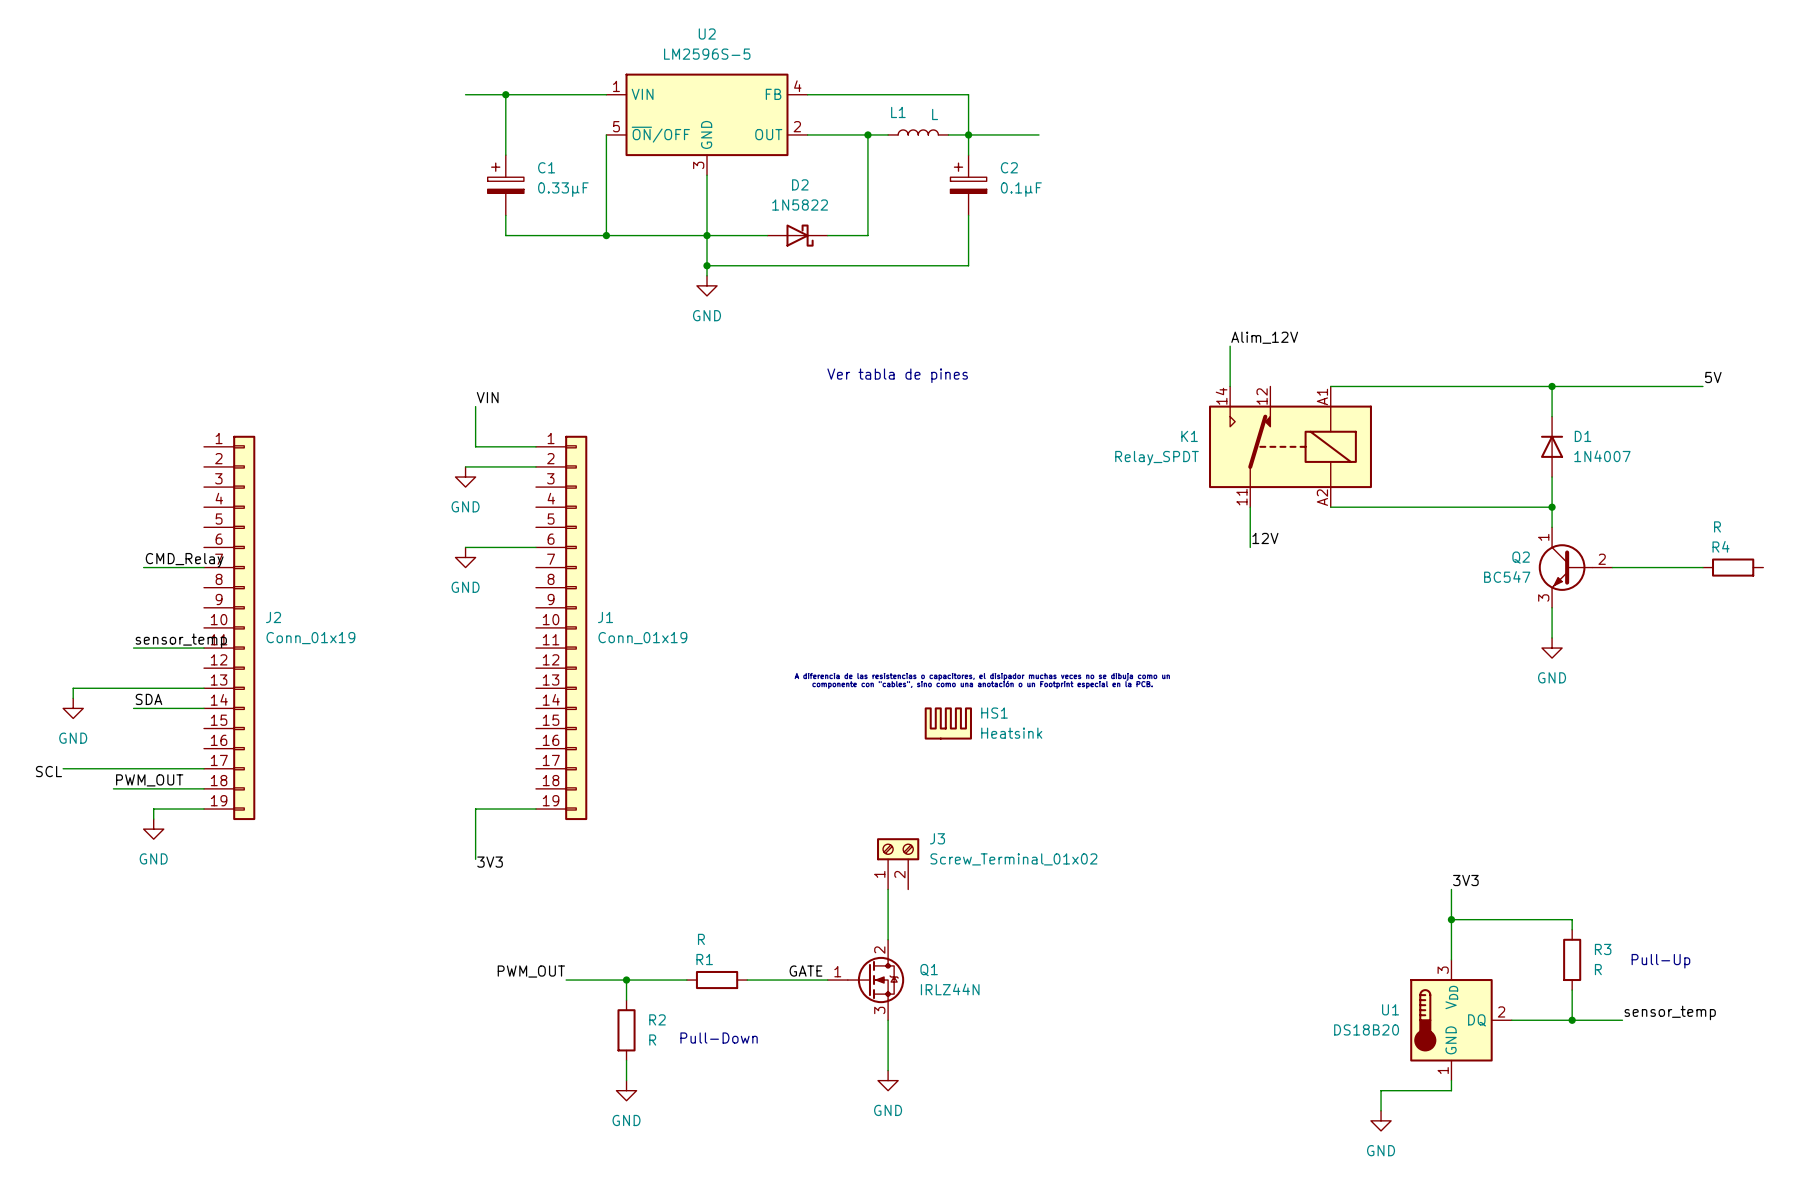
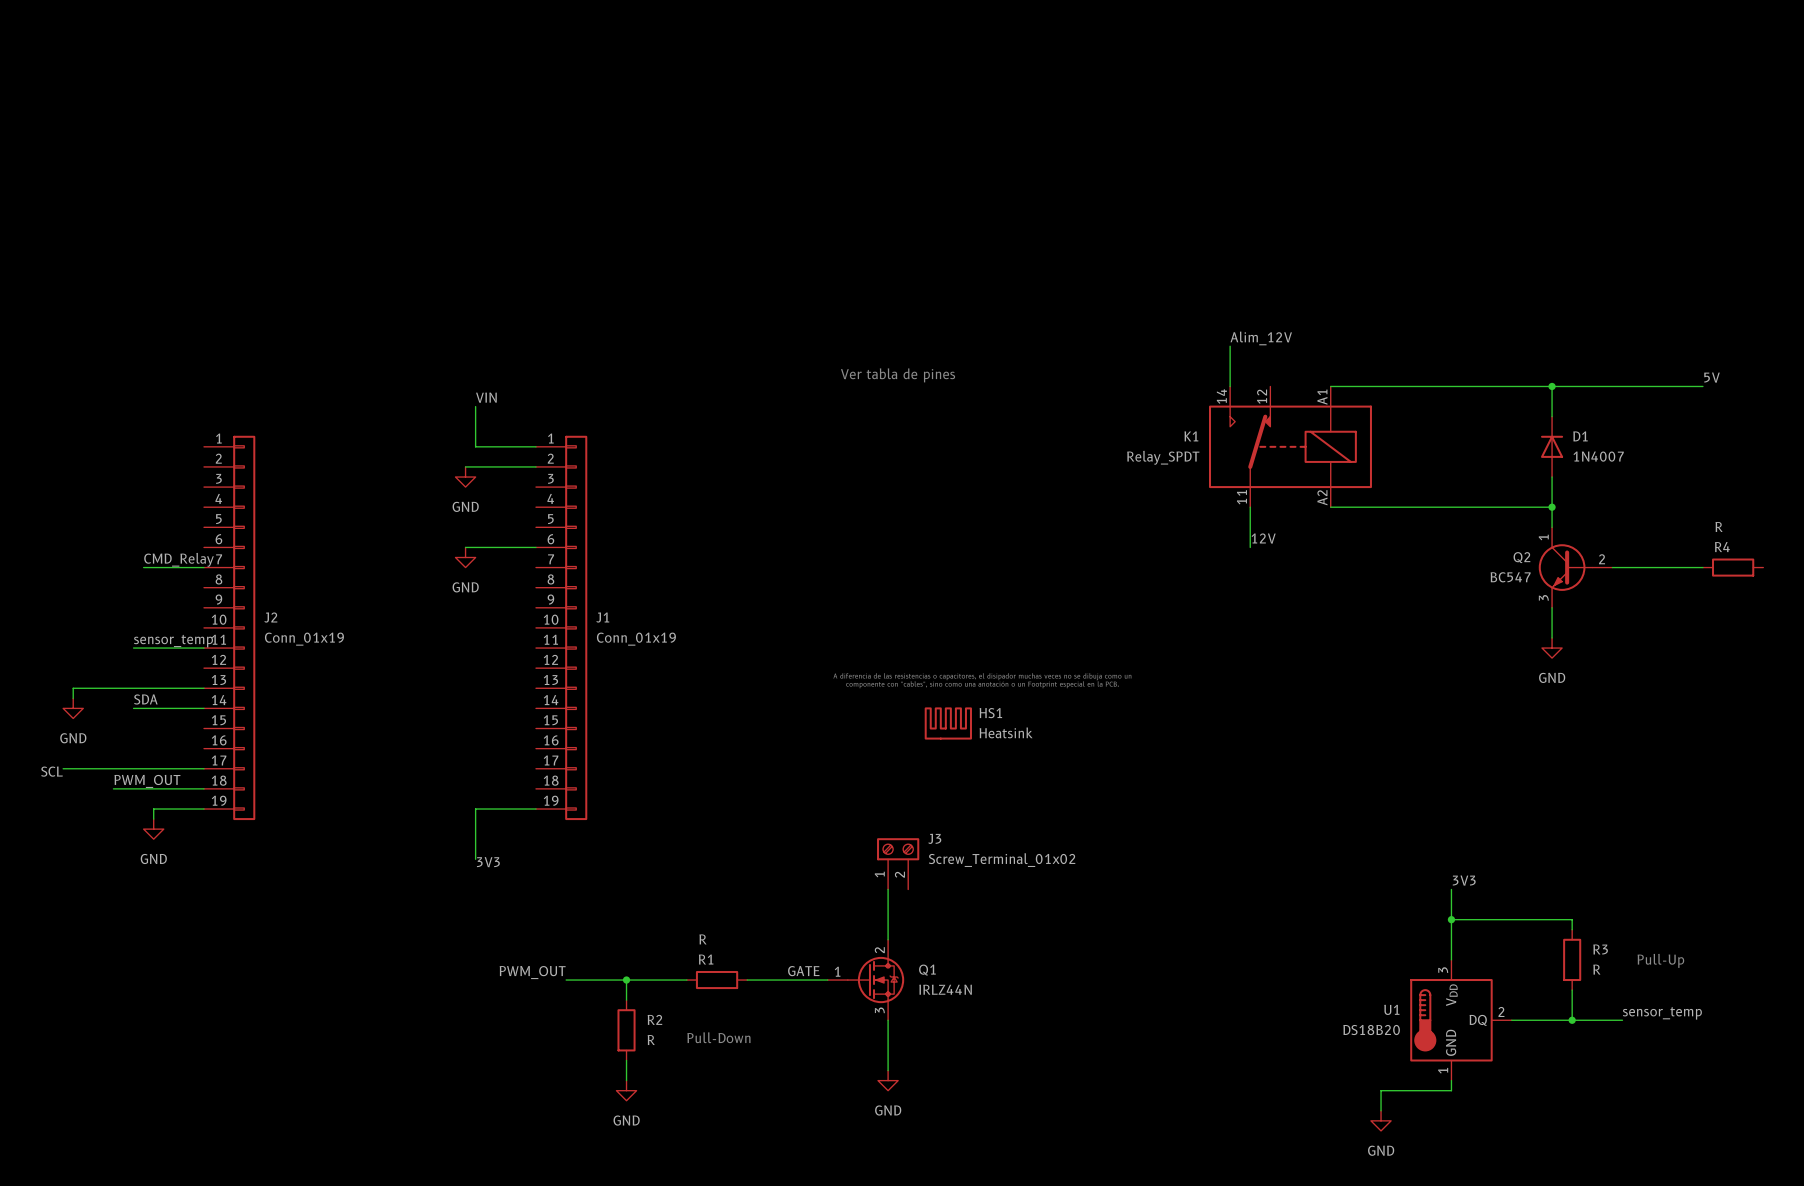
wire: (465, 94) (606, 94) -> none
wire: (505, 94) (505, 155) -> none
junction: (505, 94) -> none
wire: (807, 94) (968, 94) (968, 155) -> none
U2: LM2596S-5 (707, 124) -> none
L1: L (918, 132) -> none
wire: (606, 134) (606, 235) -> none
wire: (807, 134) (888, 134) -> none
wire: (867, 134) (867, 235) (827, 235) -> none
junction: (867, 134) -> none
wire: (948, 134) (1038, 134) -> none
junction: (968, 134) -> none
wire: (707, 175) (707, 275) -> none
C1: 0.33µF (505, 185) -> none
C2: 0.1µF (968, 185) -> none
wire: (505, 215) (505, 235) (767, 235) -> none
wire: (968, 215) (968, 265) (707, 265) -> none
junction: (606, 235) -> none
junction: (707, 235) -> none
D2: 1N5822 (797, 235) -> none
junction: (707, 265) -> none
power symbol: GND (707, 285) -> none

